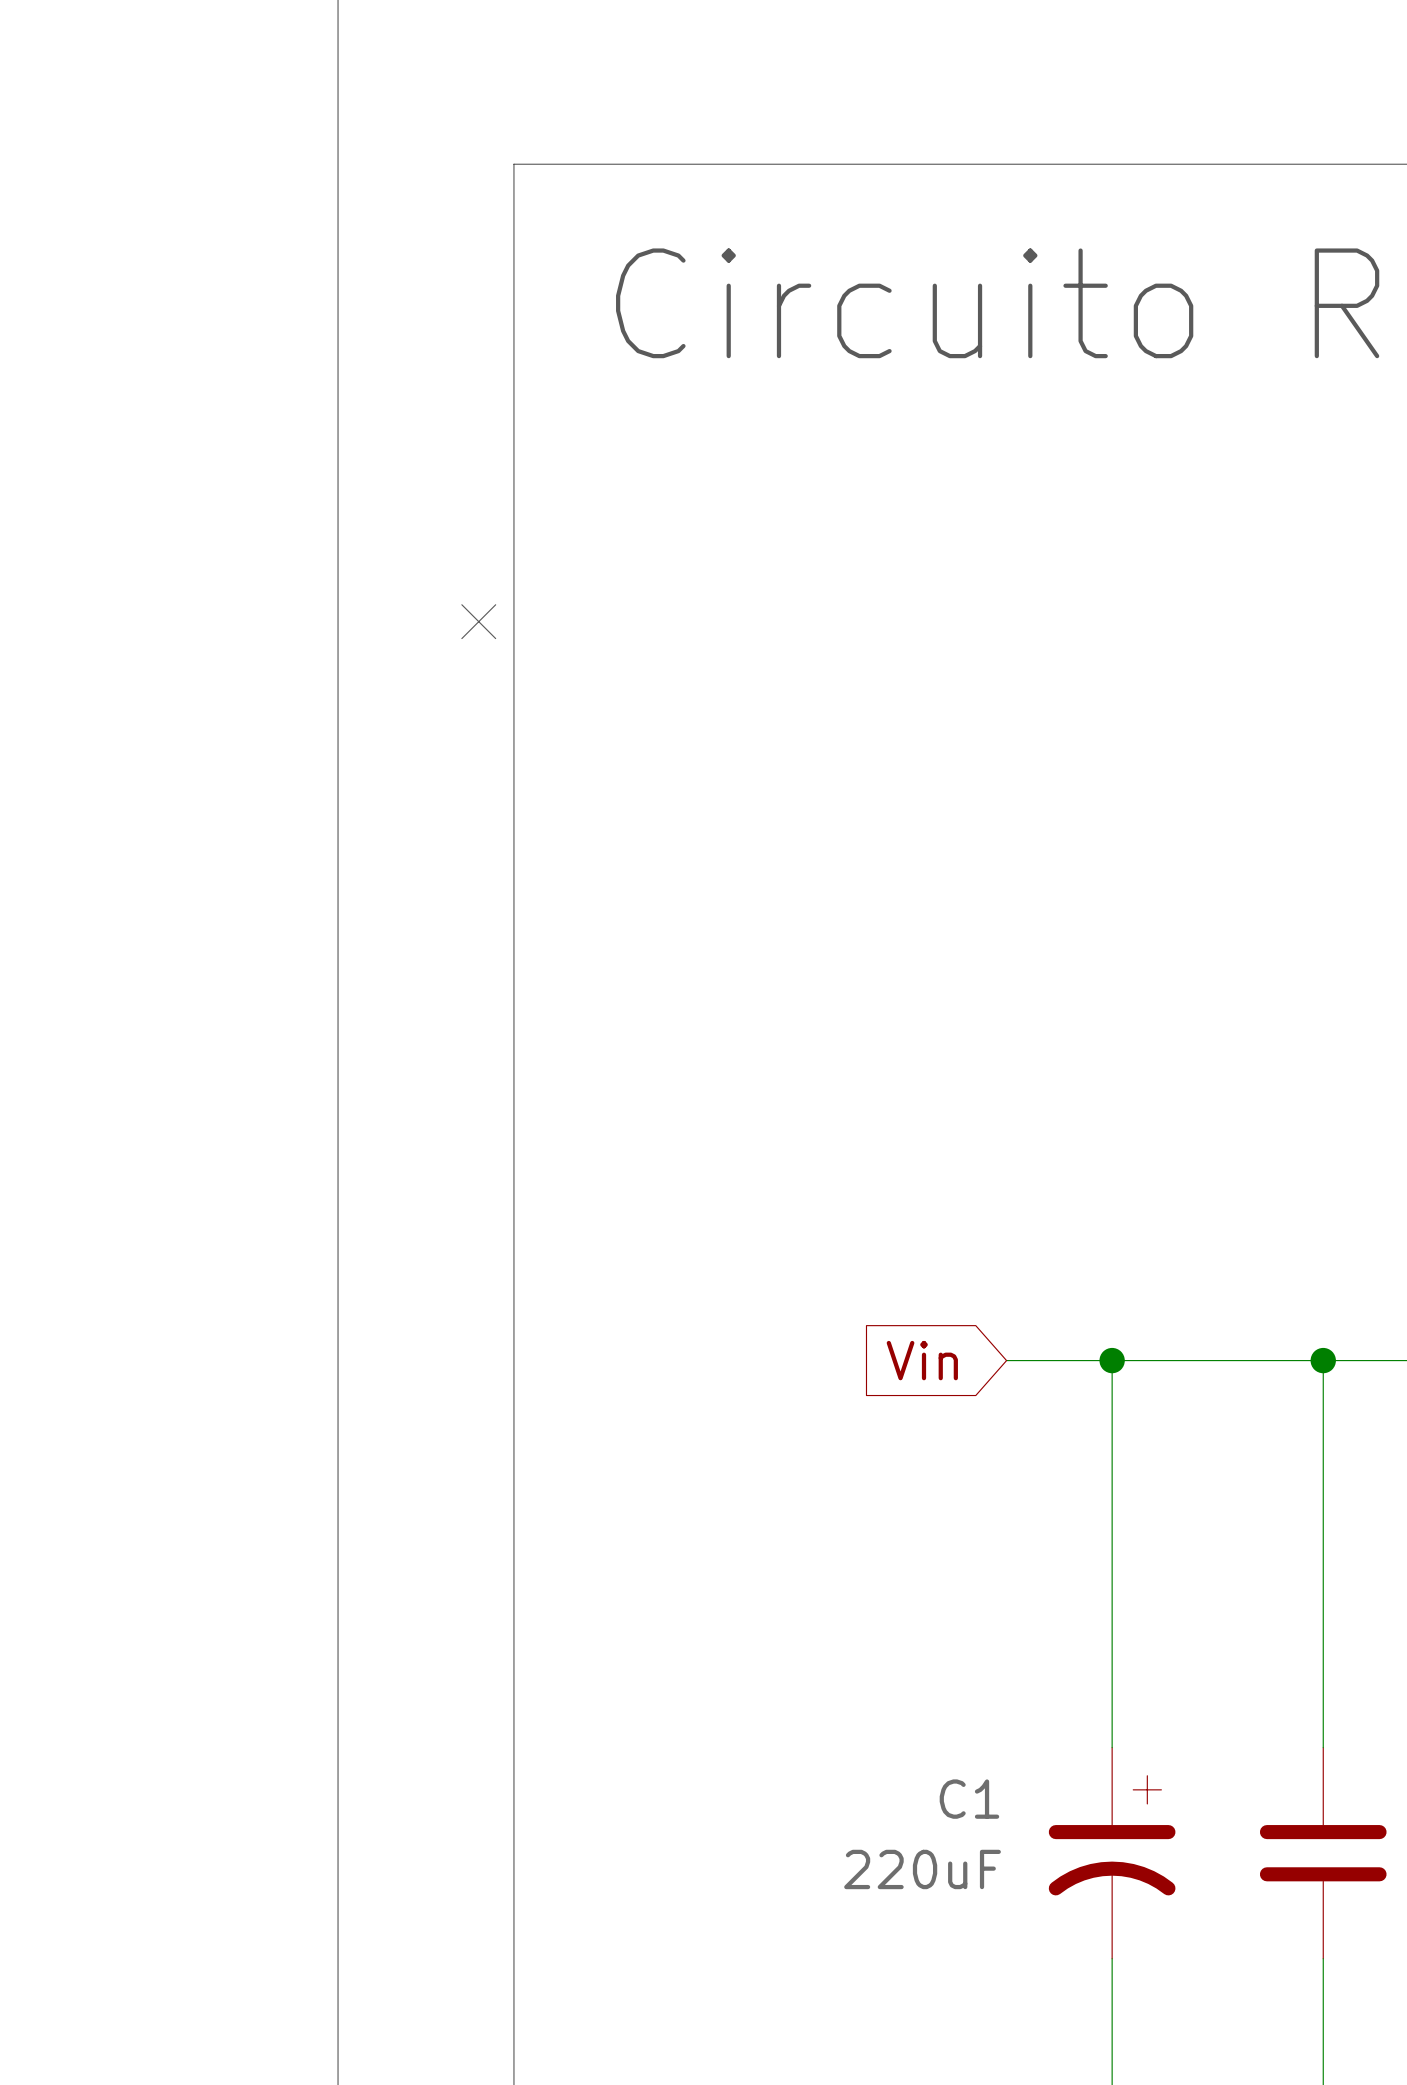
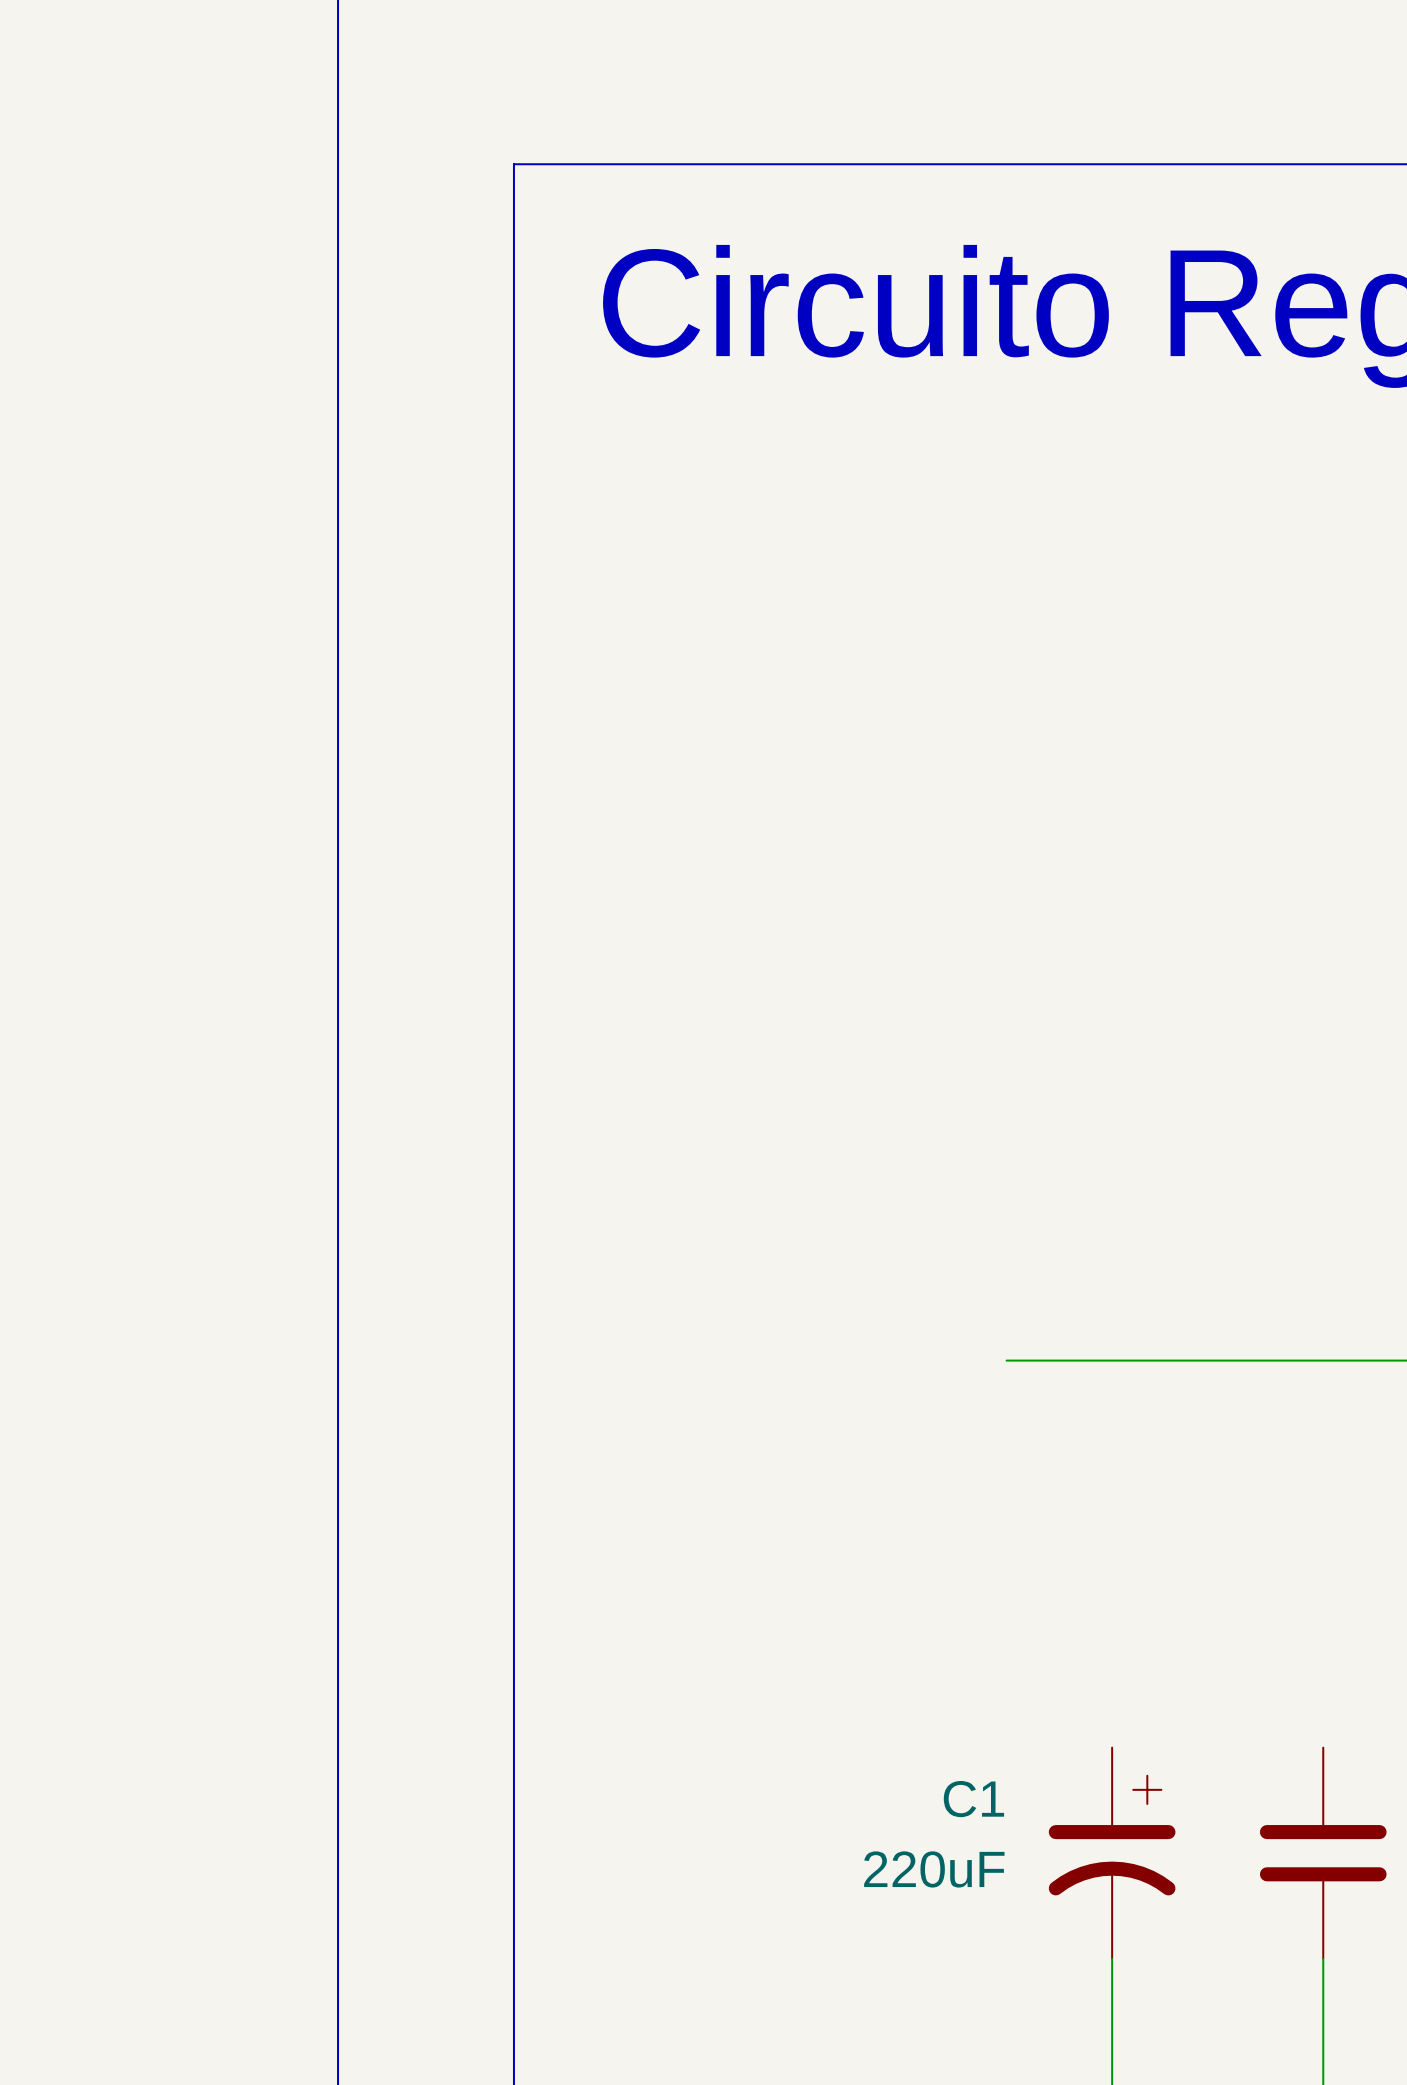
no-connect mark: (478, 621) -> none
global label: Vin (922, 1360) -> none
wire: (1112, 1360) (1112, 1747) -> none
junction: (1112, 1360) -> none
wire: (1323, 1360) (1323, 1747) -> none
junction: (1323, 1360) -> none

